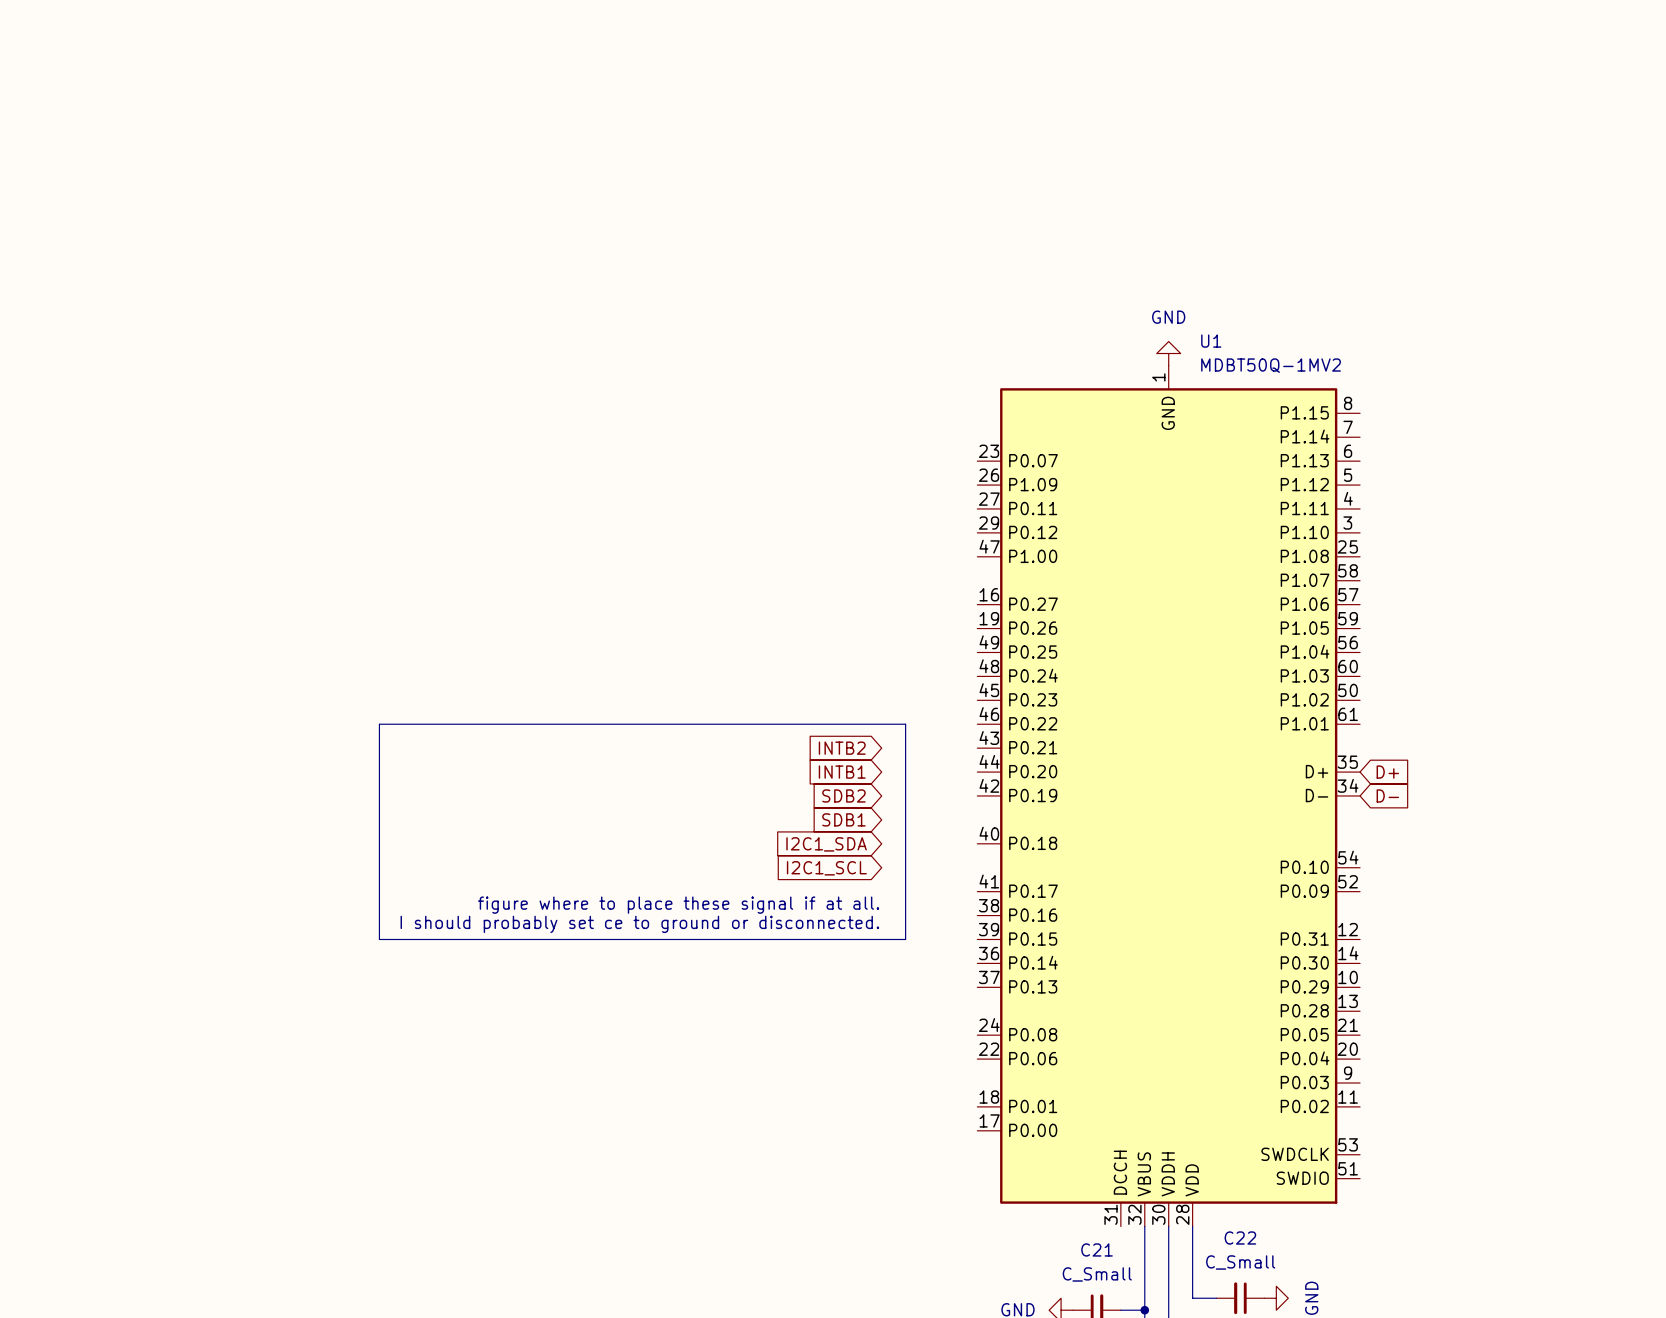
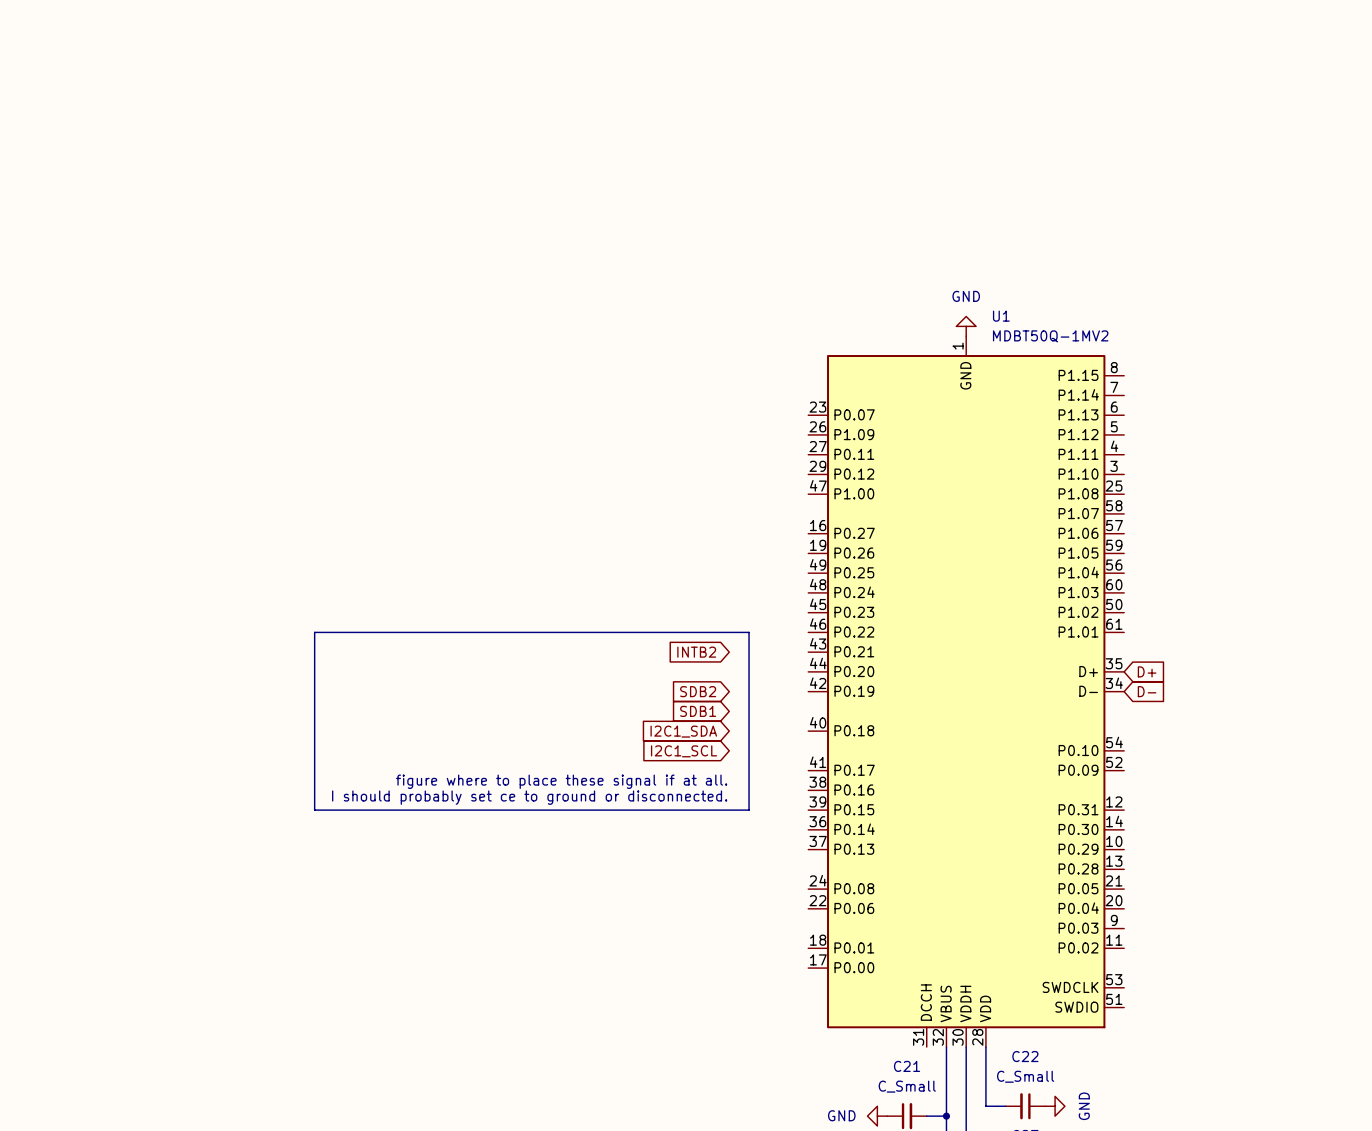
global label: INTB1 (842, 772) -> none

